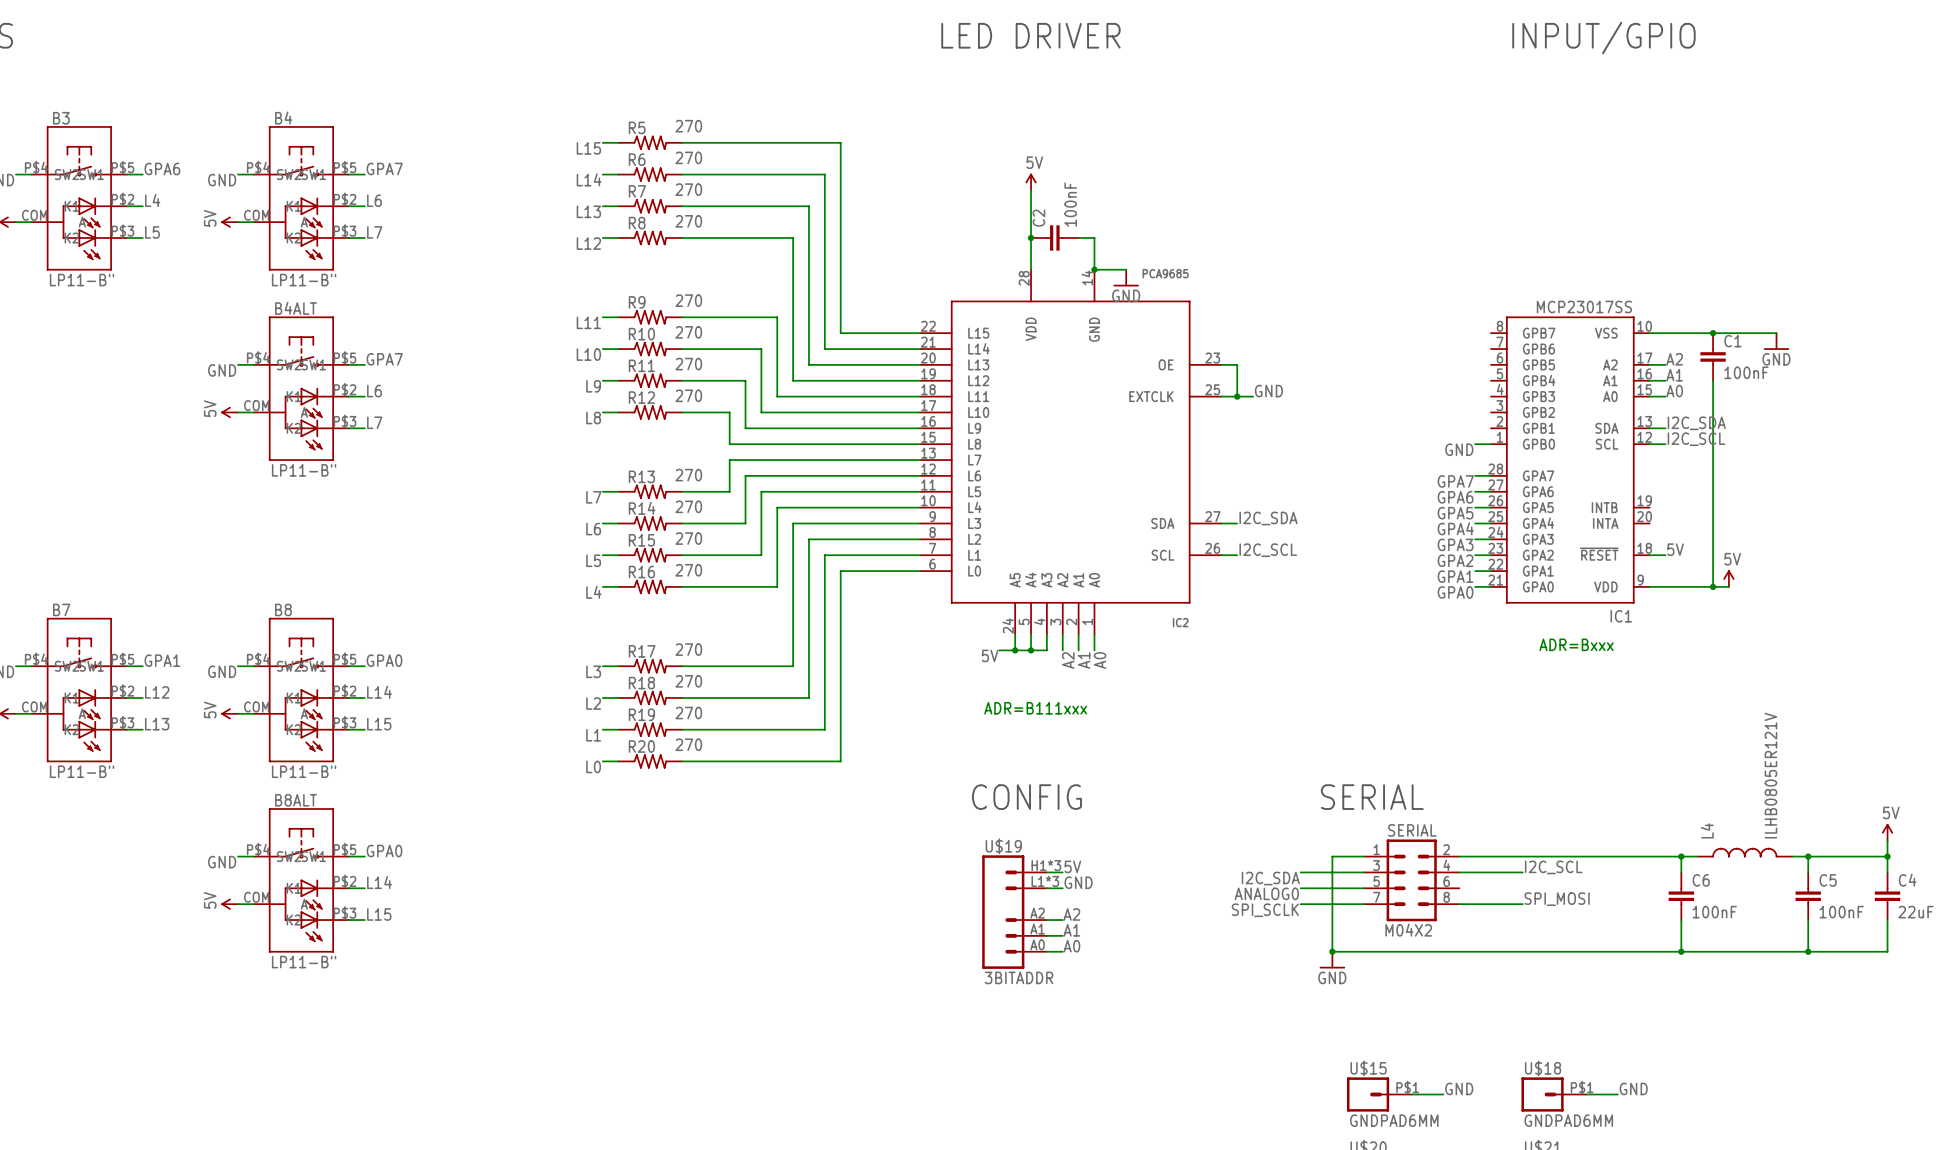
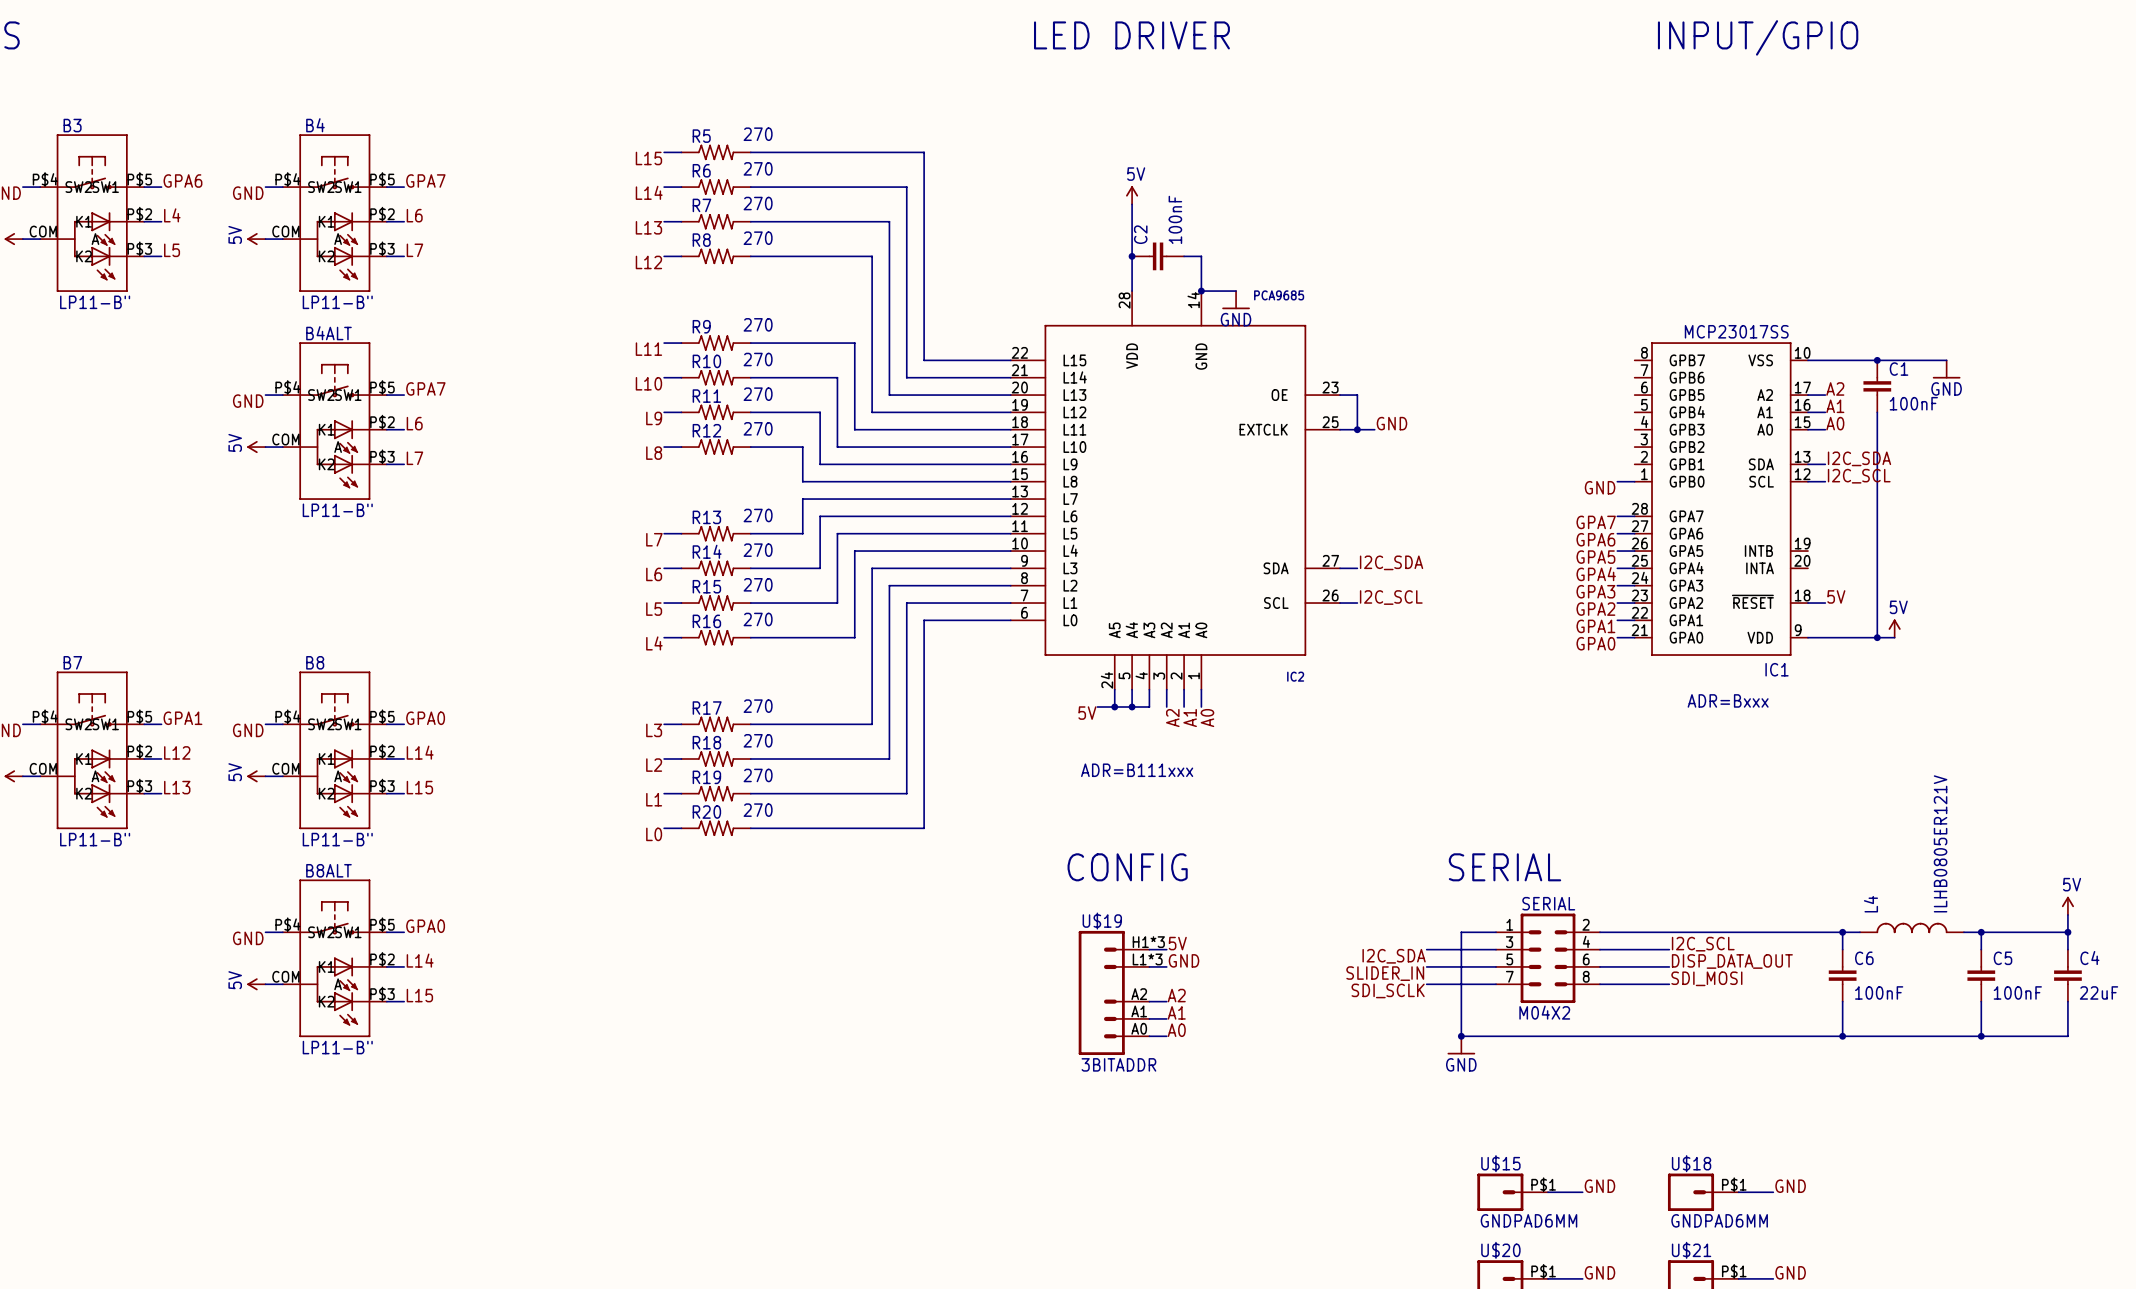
label: none -> DISP_DATA_OUT (1732, 961)
wire: none -> (1600, 966) (1669, 966)
label: ANALOG0 (1266, 893) -> SLIDER_IN (1385, 973)
label: SPI_MOSI (1557, 899) -> SDI_MOSI (1706, 978)
label: SPI_SCLK (1265, 910) -> SDI_SCLK (1388, 990)

